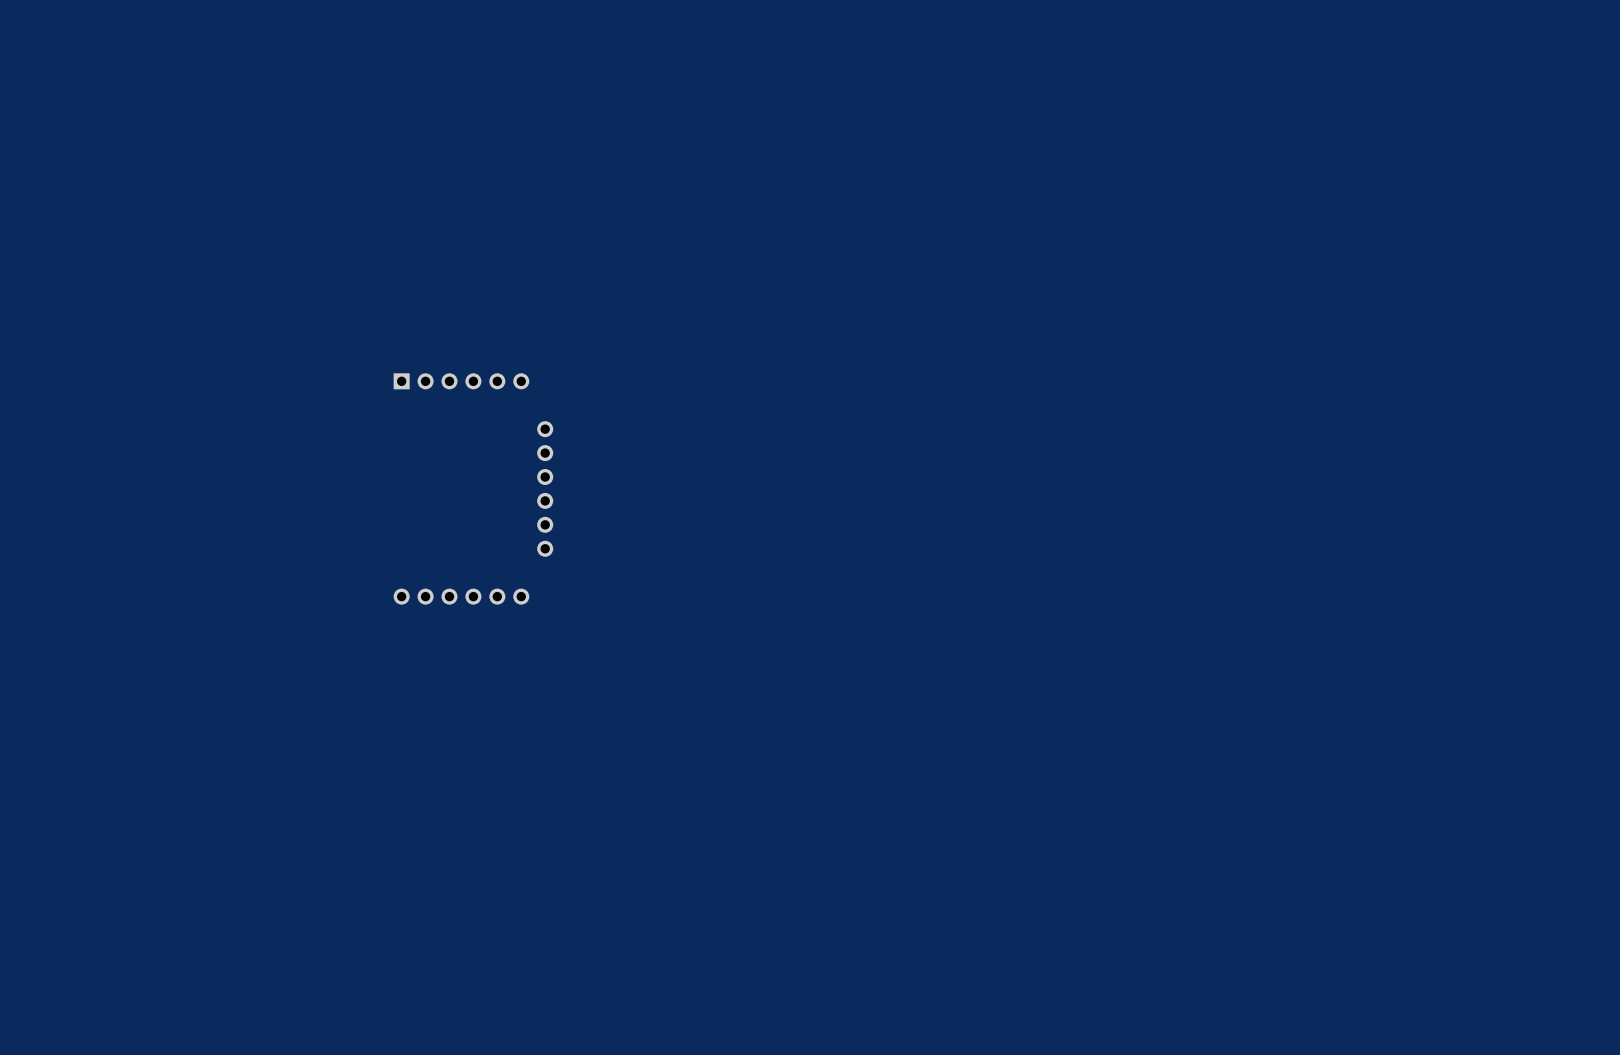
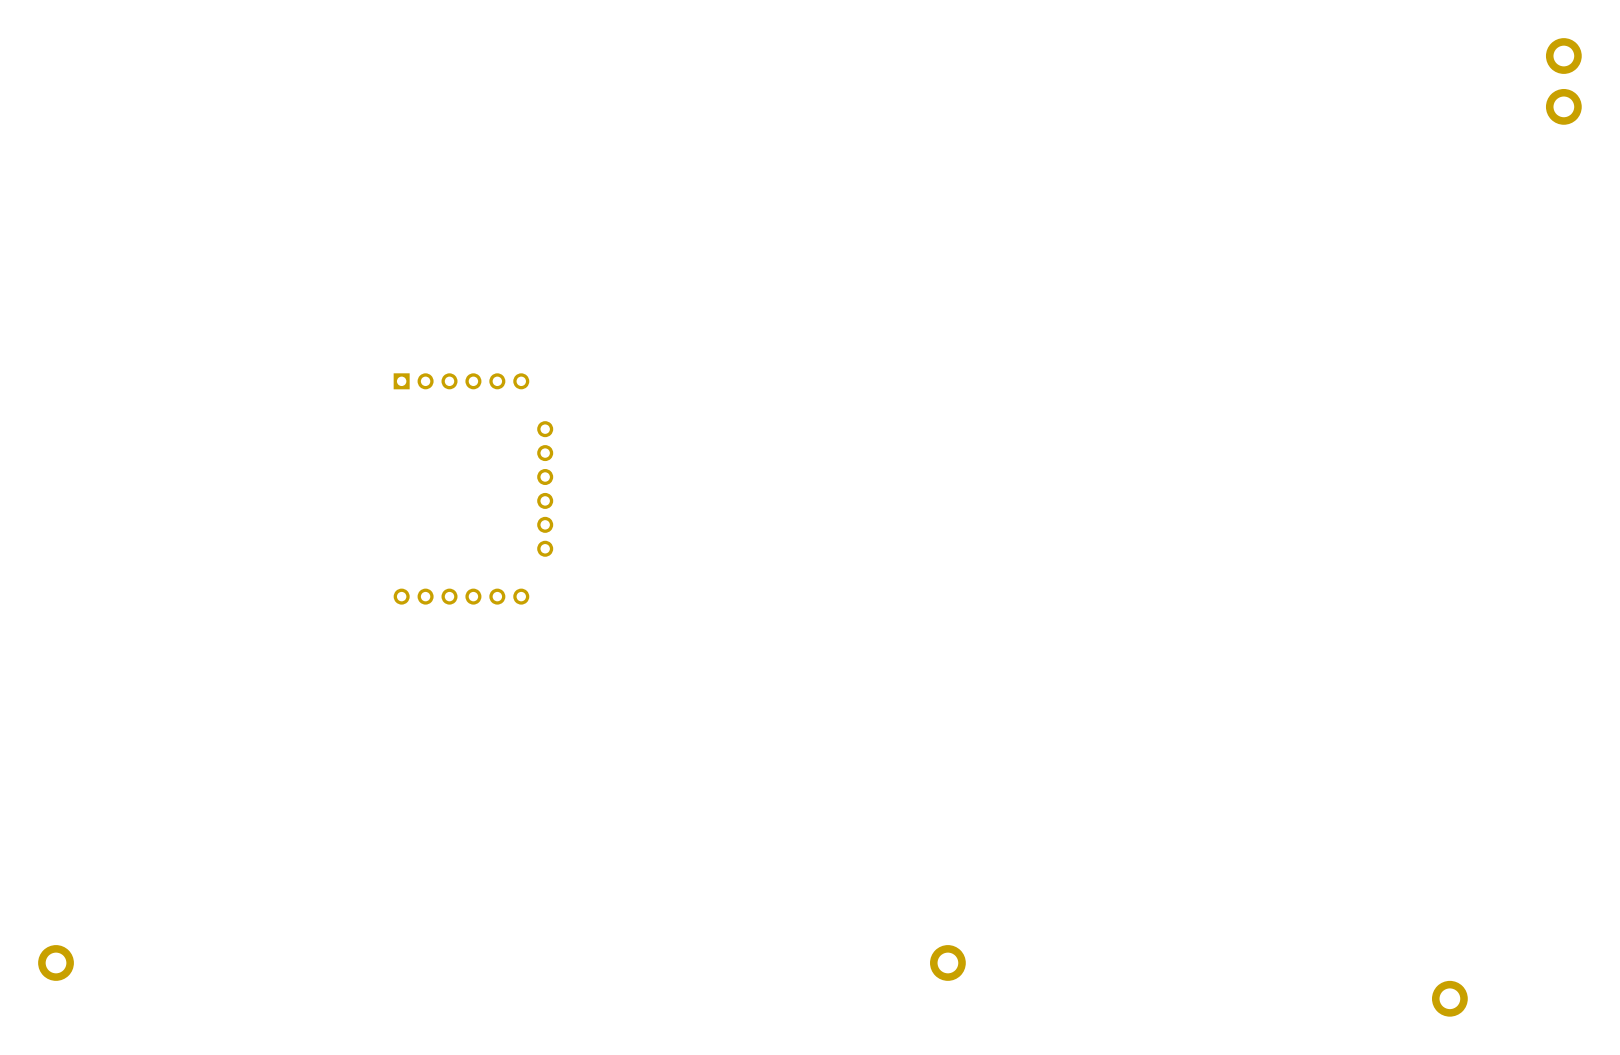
part: none -> (1563, 56)
part: none -> (1563, 106)
part: none -> (56, 962)
part: none -> (947, 962)
part: none -> (1449, 998)

